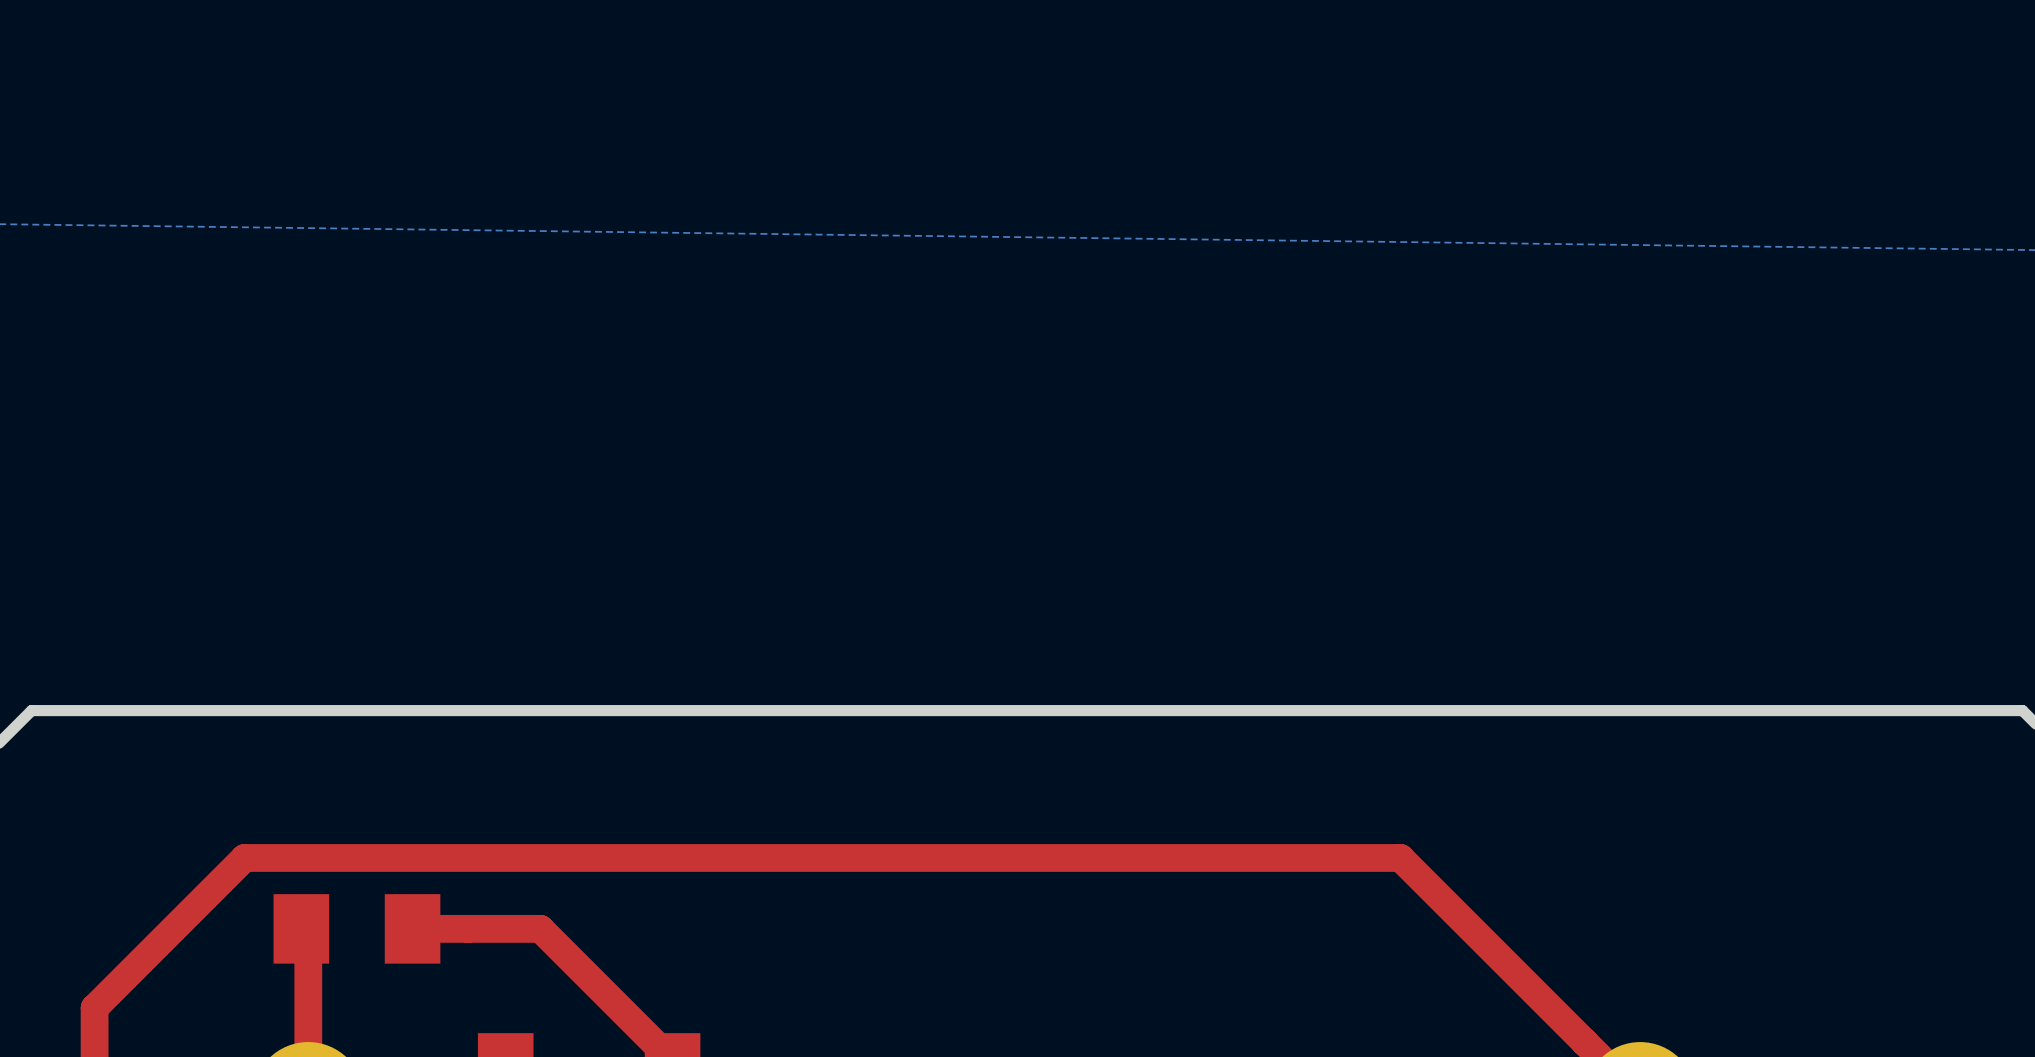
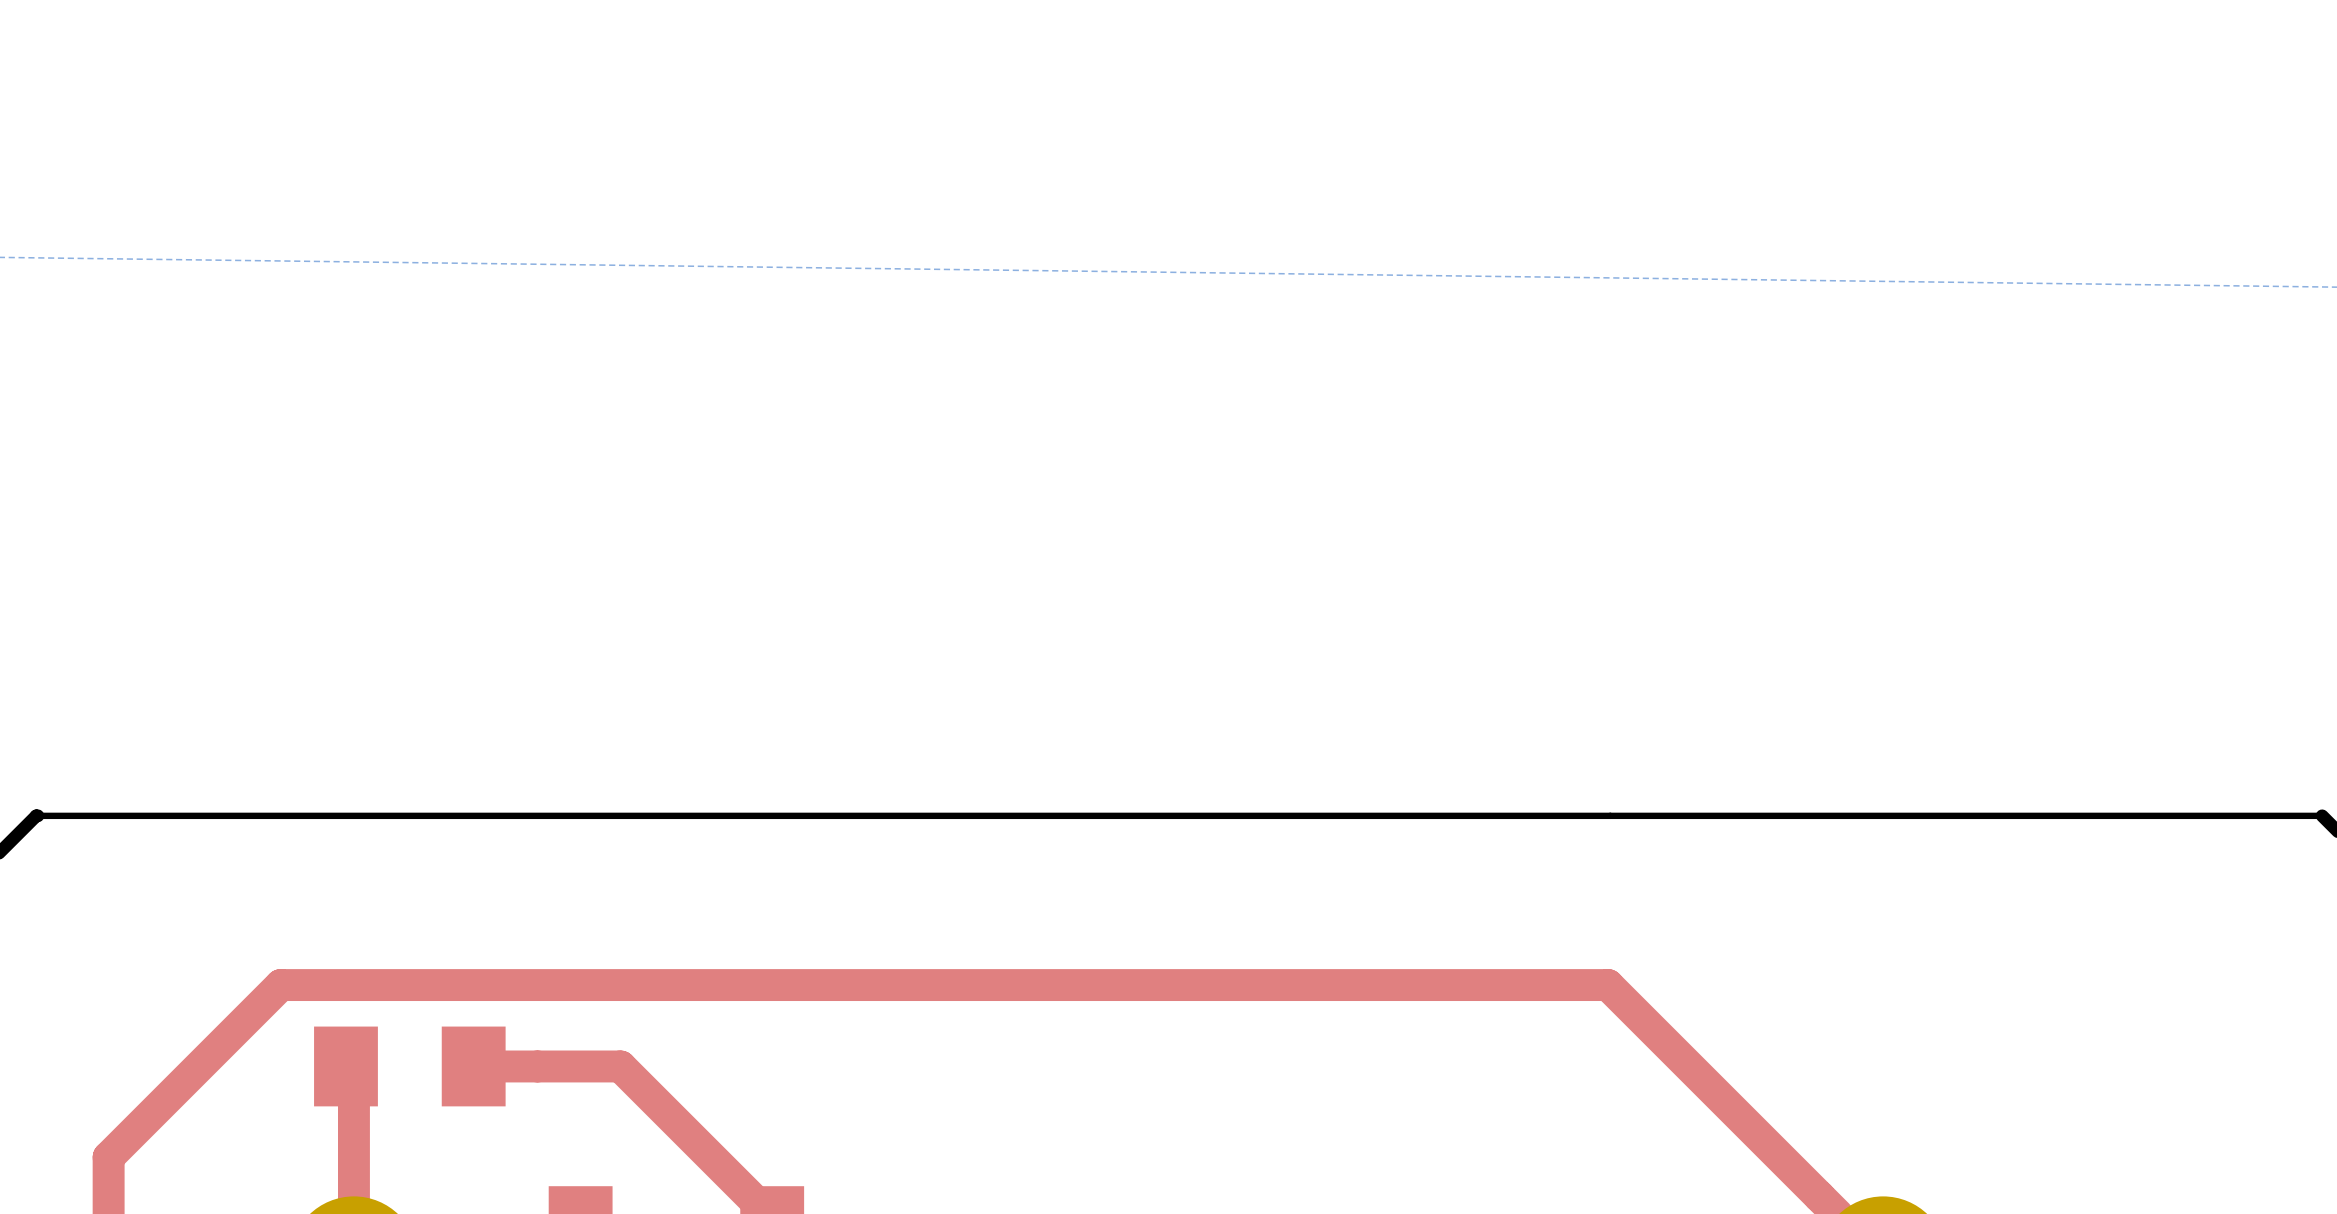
board edge width: thick (2022, 710) (33, 710) -> thin (2322, 815) (37, 815)

